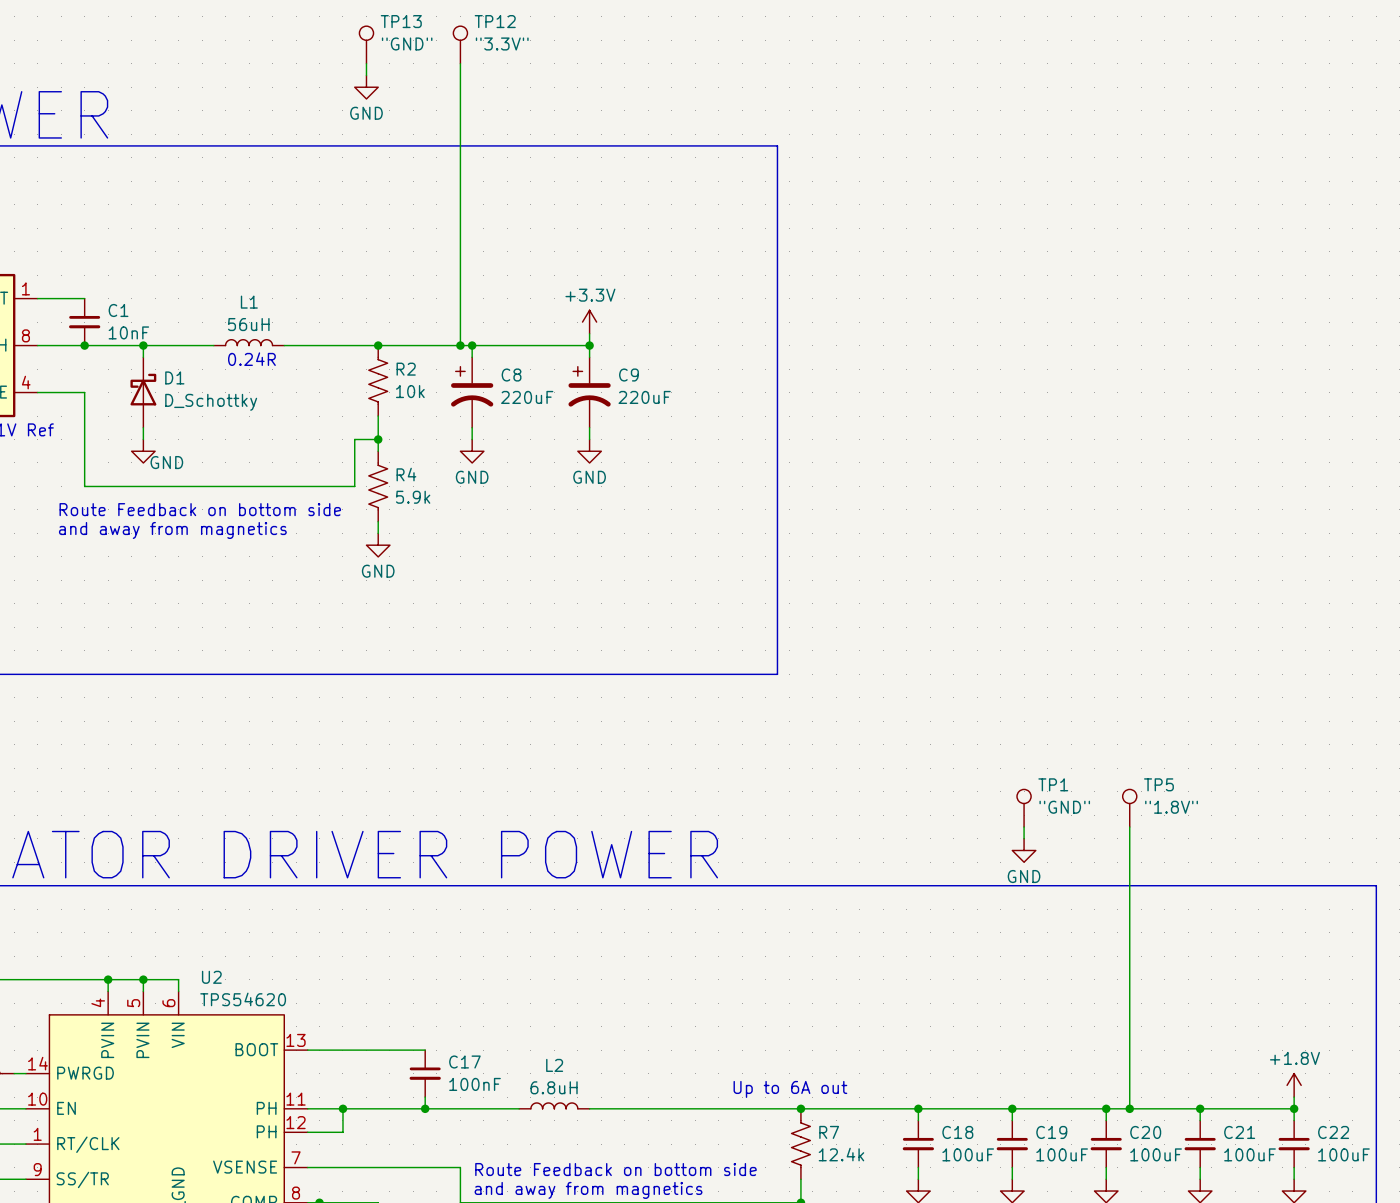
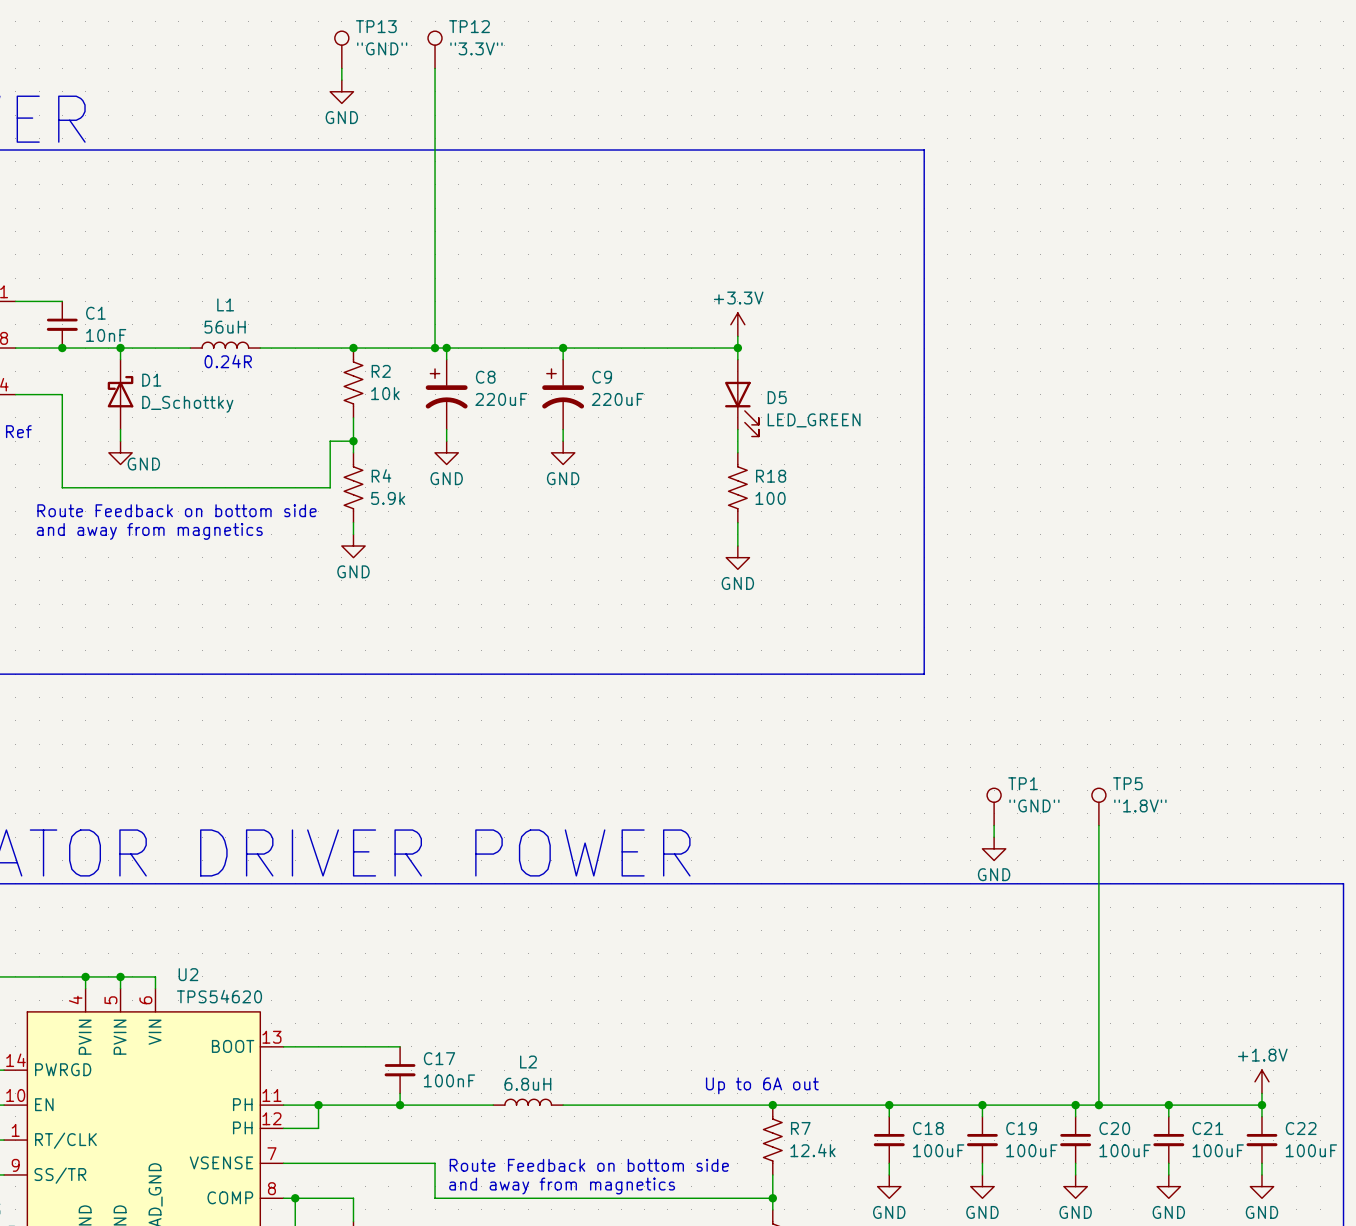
line: (777, 145) (777, 674) -> (749, 150) (924, 150) (924, 674) (749, 674)
power symbol position: +3.3V (589, 322) -> +3.3V (737, 324)
wire: (589, 333) (589, 345) -> (737, 348) (563, 348)
wire: none -> (737, 336) (737, 359)
junction: none -> (737, 348)
D5: none -> LED_GREEN (741, 398)
wire: none -> (737, 429) (737, 452)
R18: none -> 100 (737, 487)
wire: none -> (737, 522) (737, 546)
power symbol: none -> GND (737, 557)

